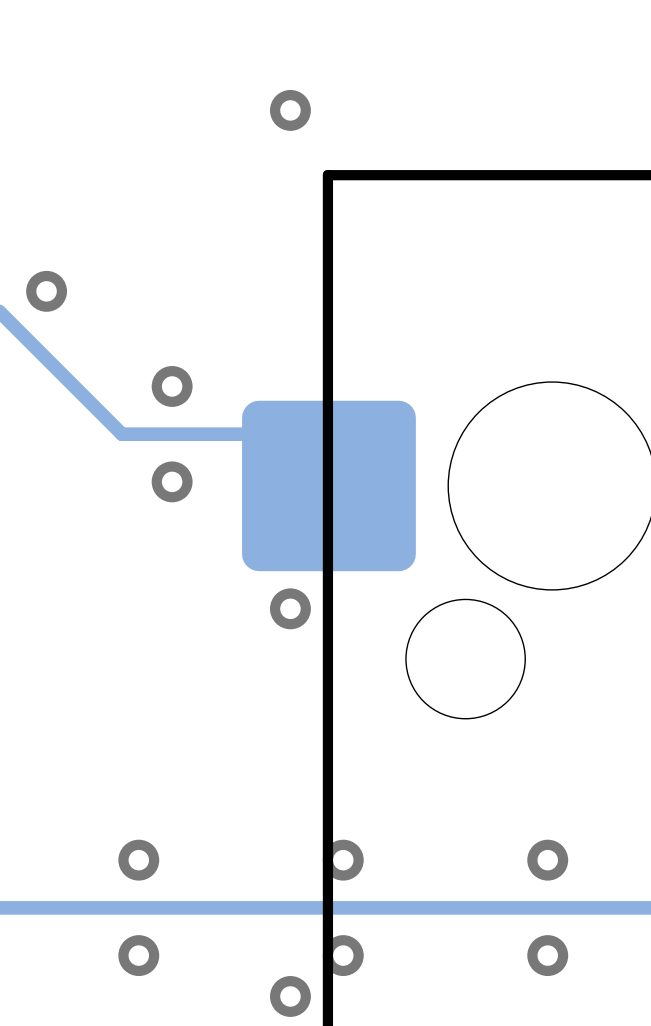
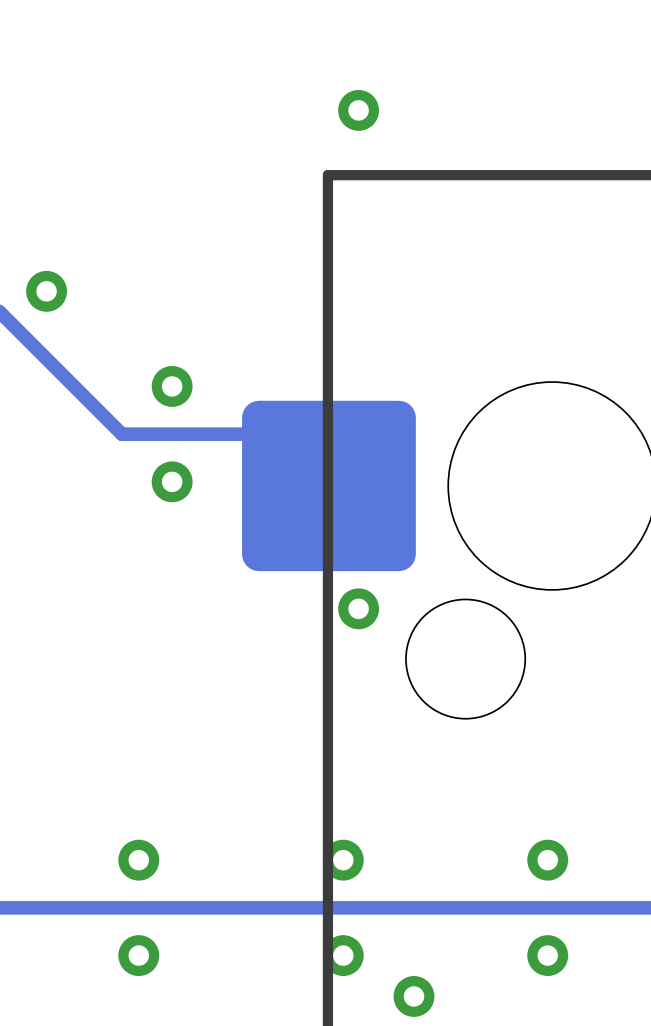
via position: (290, 110) -> (358, 110)
via position: (290, 608) -> (358, 608)
via position: (290, 996) -> (413, 996)

